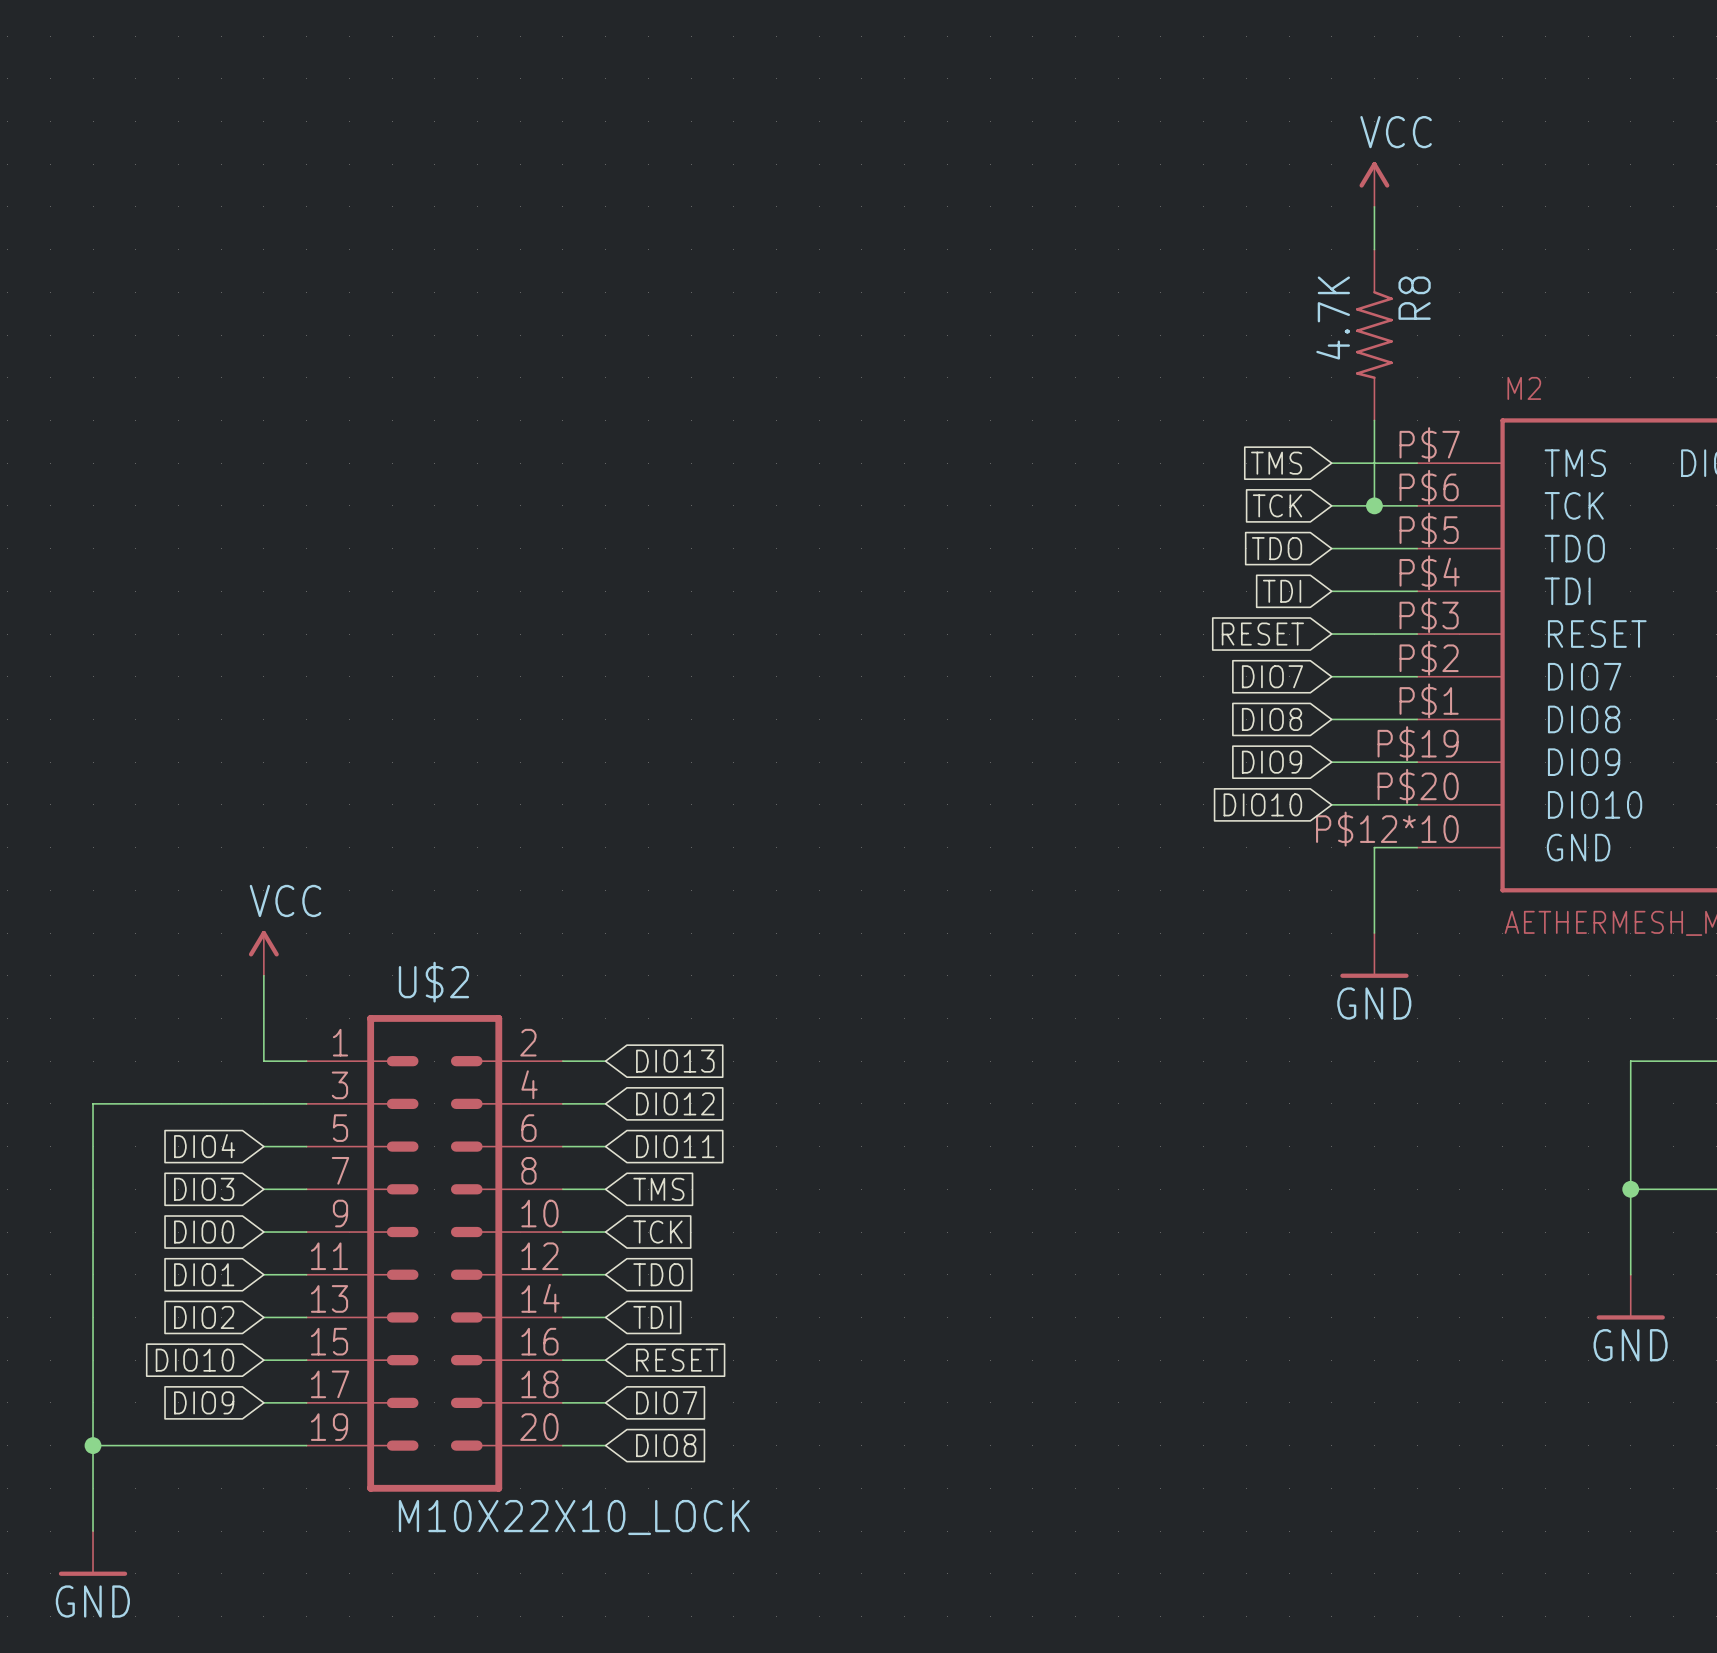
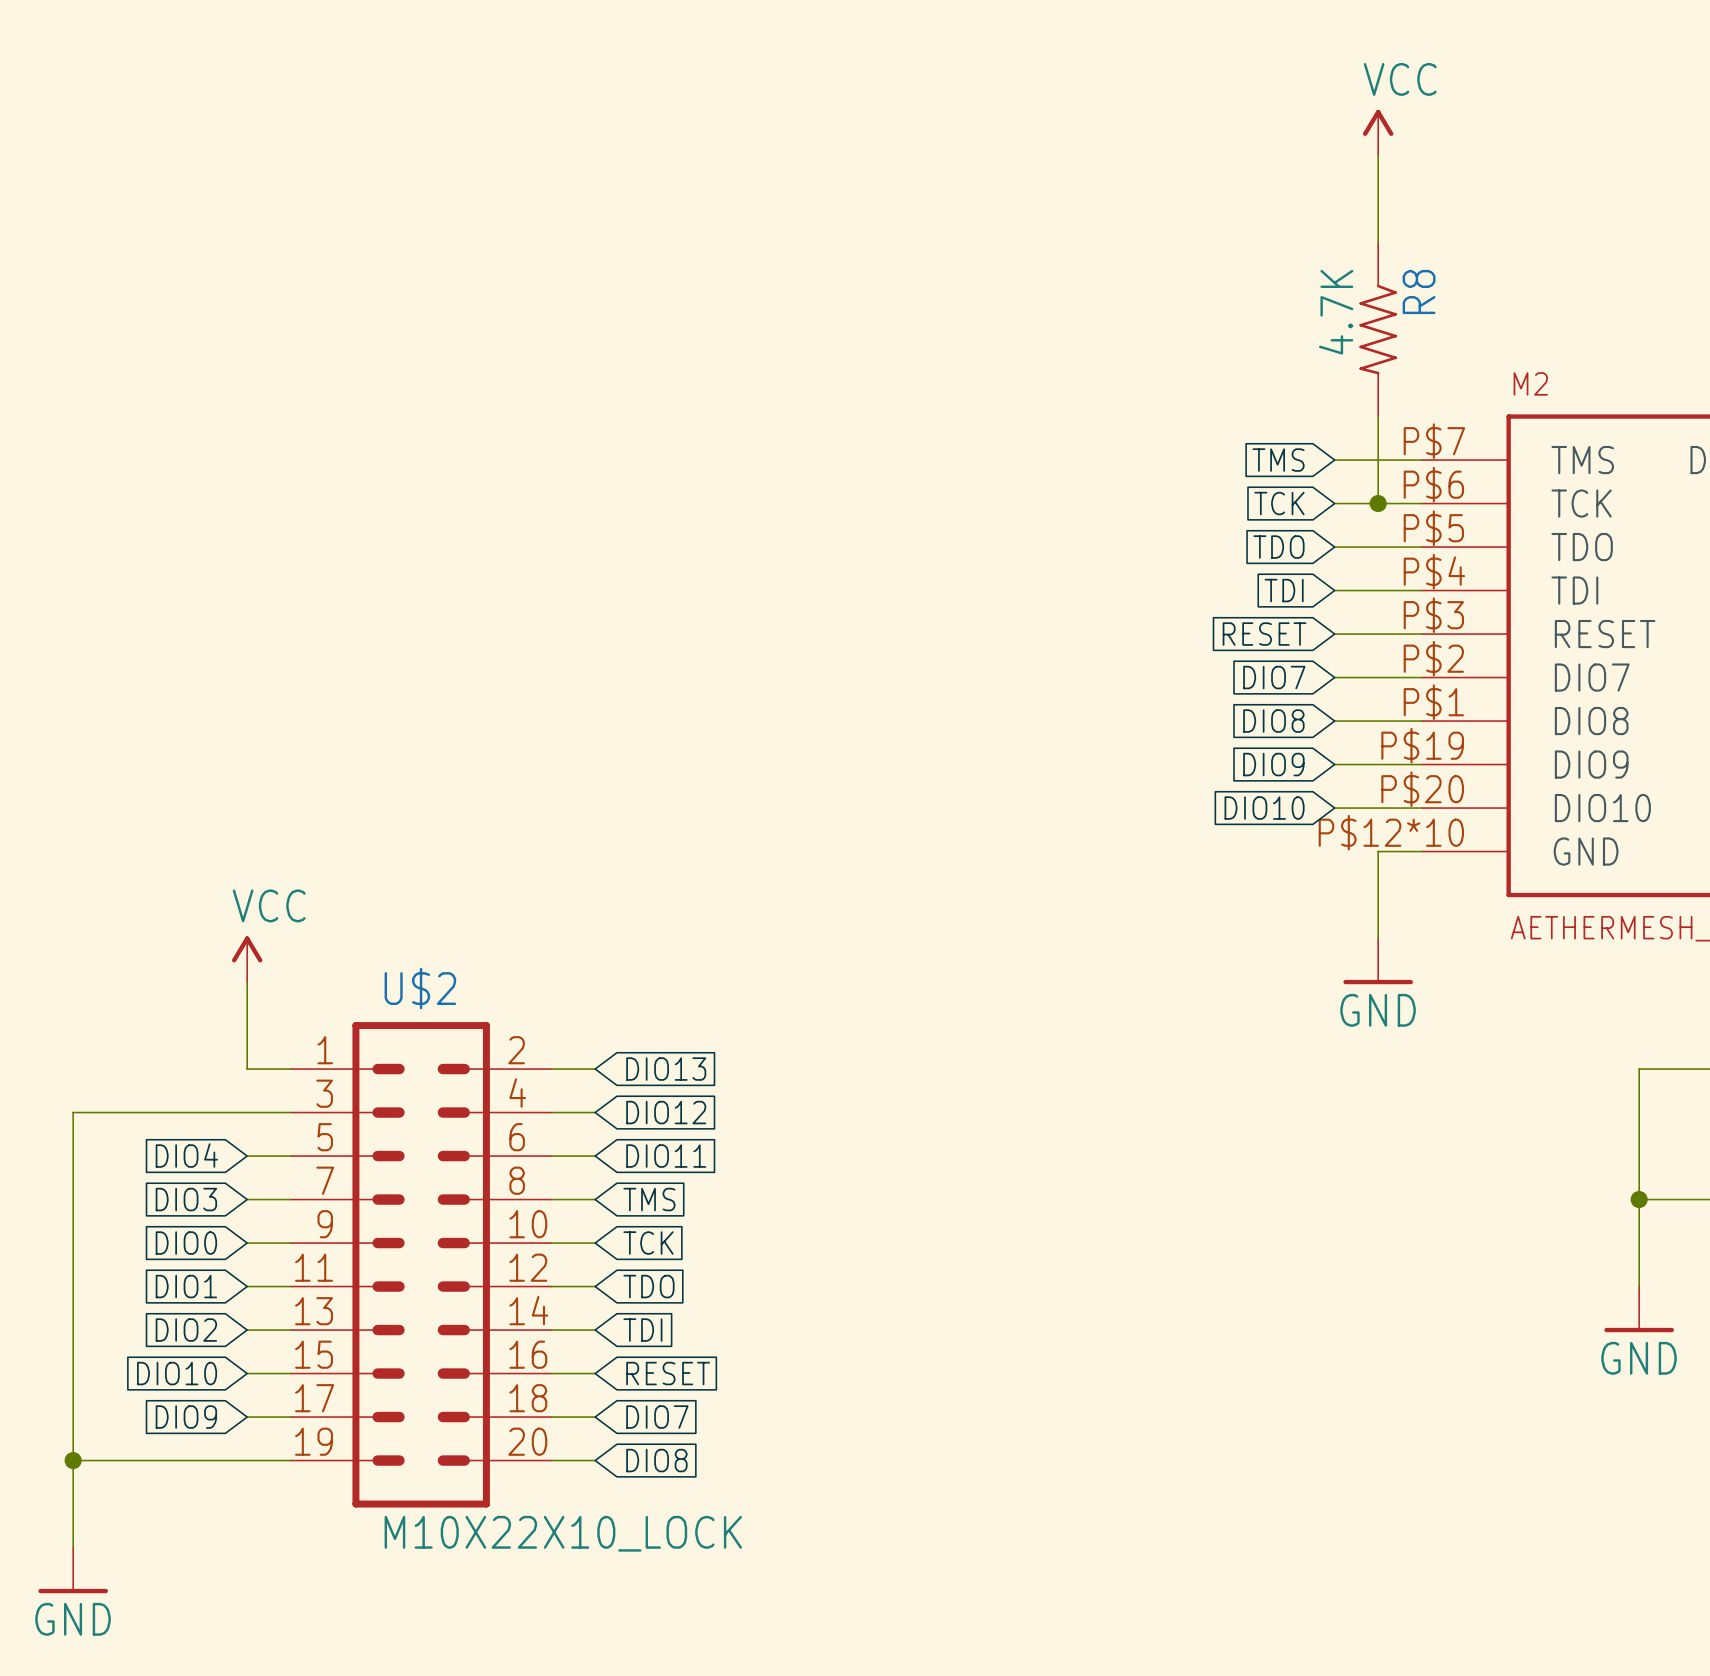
power symbol position: VCC (1374, 184) -> VCC (1378, 132)

